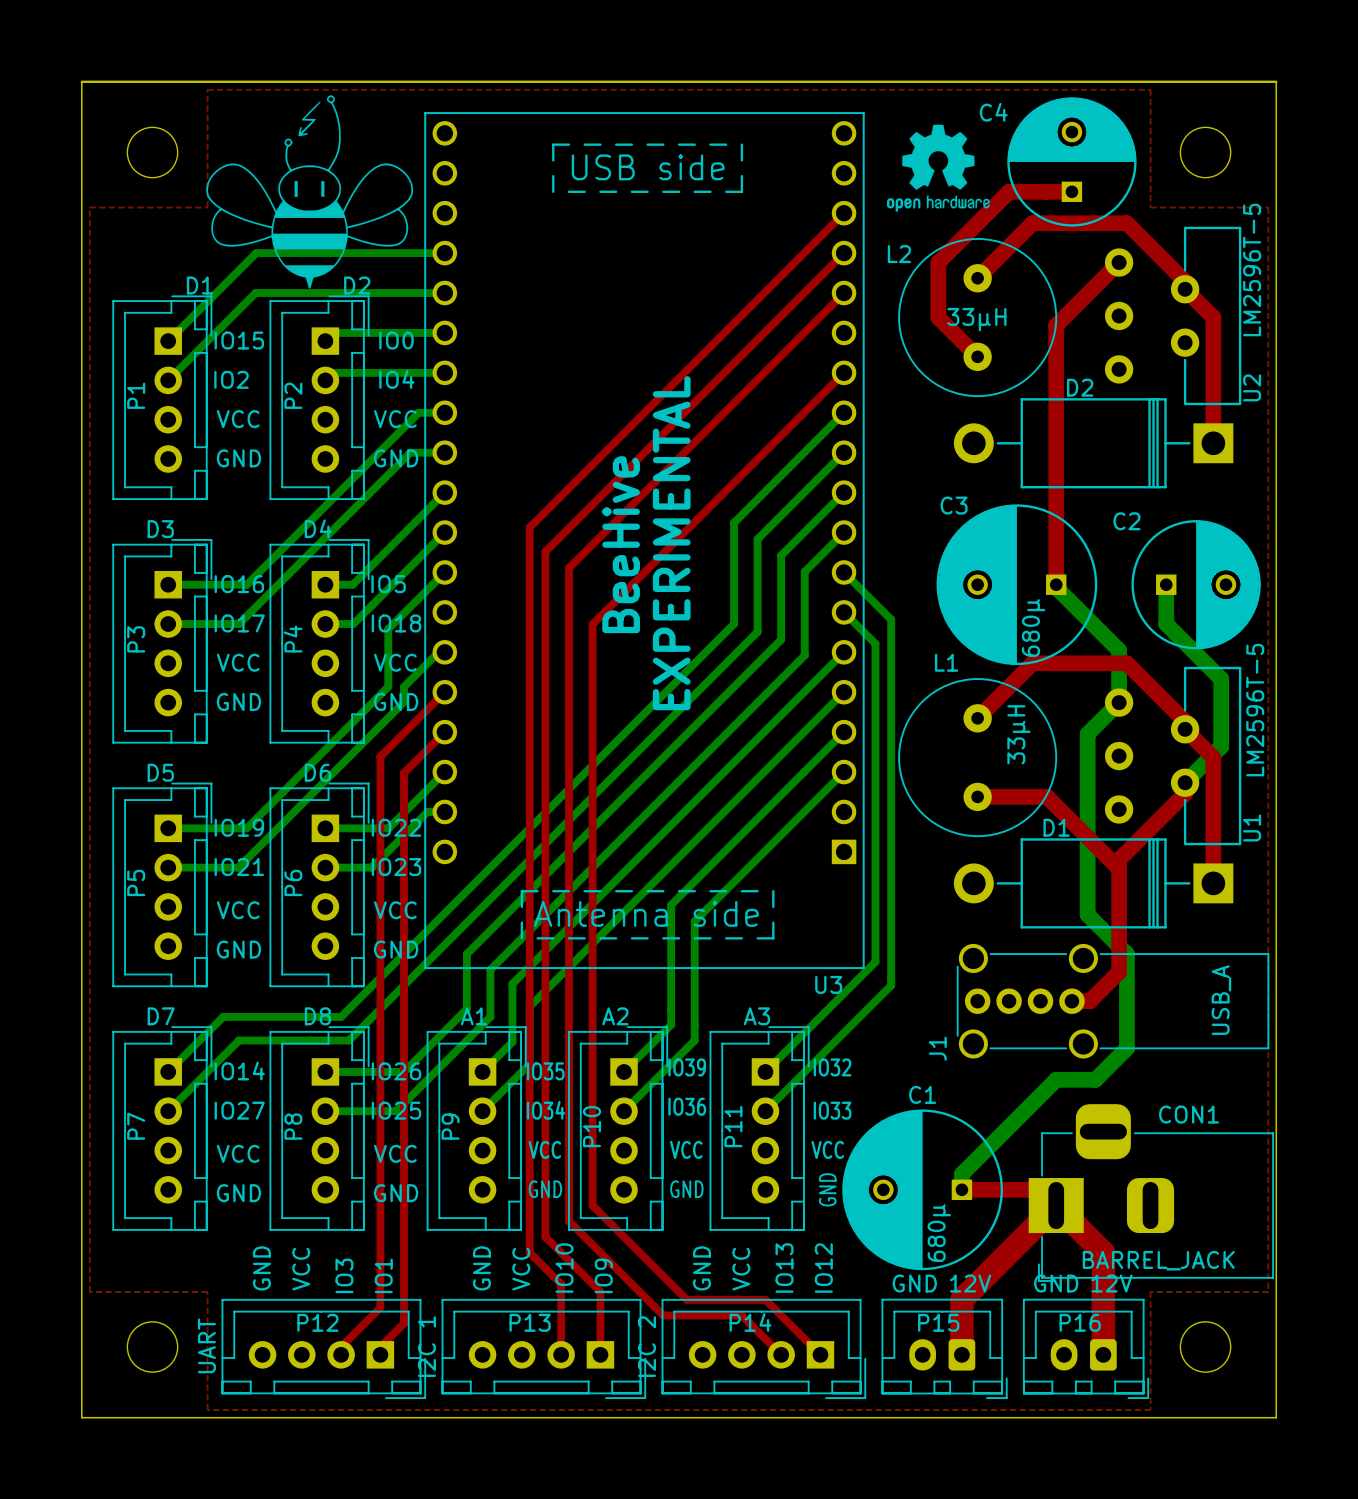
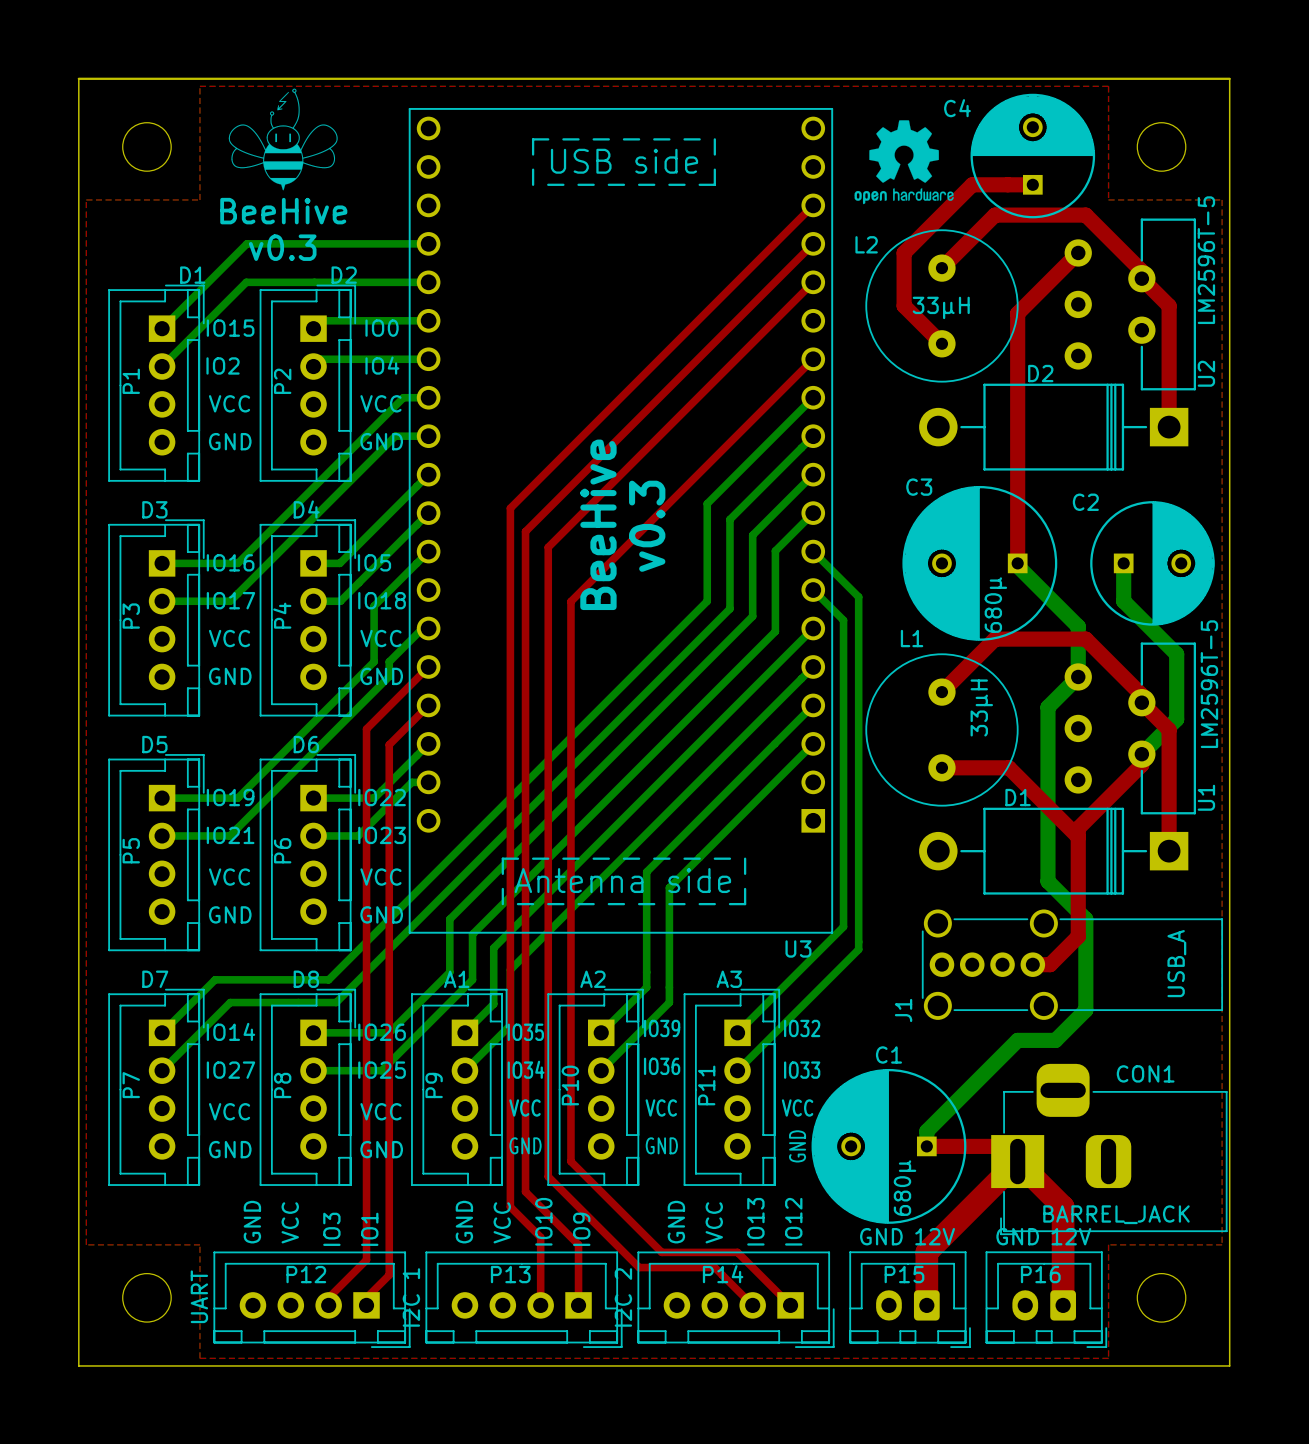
drawing: none -> [228, 88, 338, 191]
drawing: [206, 95, 414, 289] -> none
text: none -> BeeHive (283, 211)
text: none -> v0.3 (282, 247)
text: EXPERIMENTAL (671, 543) -> v0.3 (647, 526)

